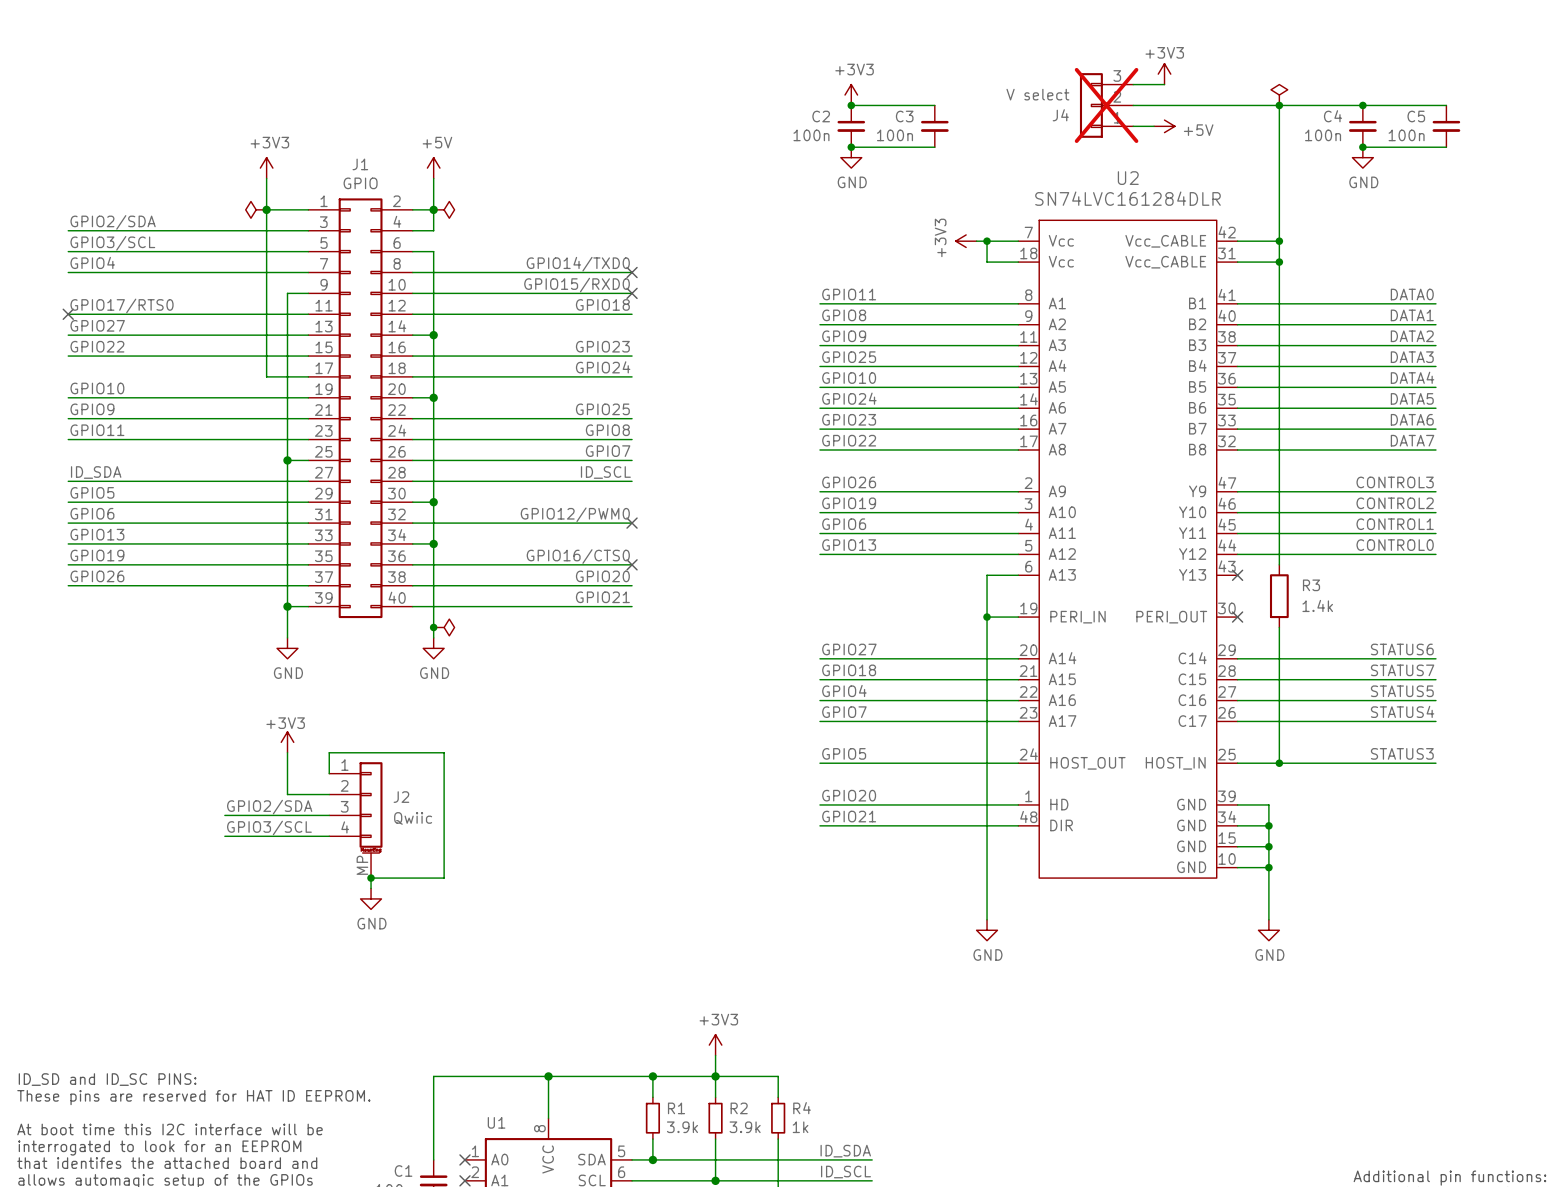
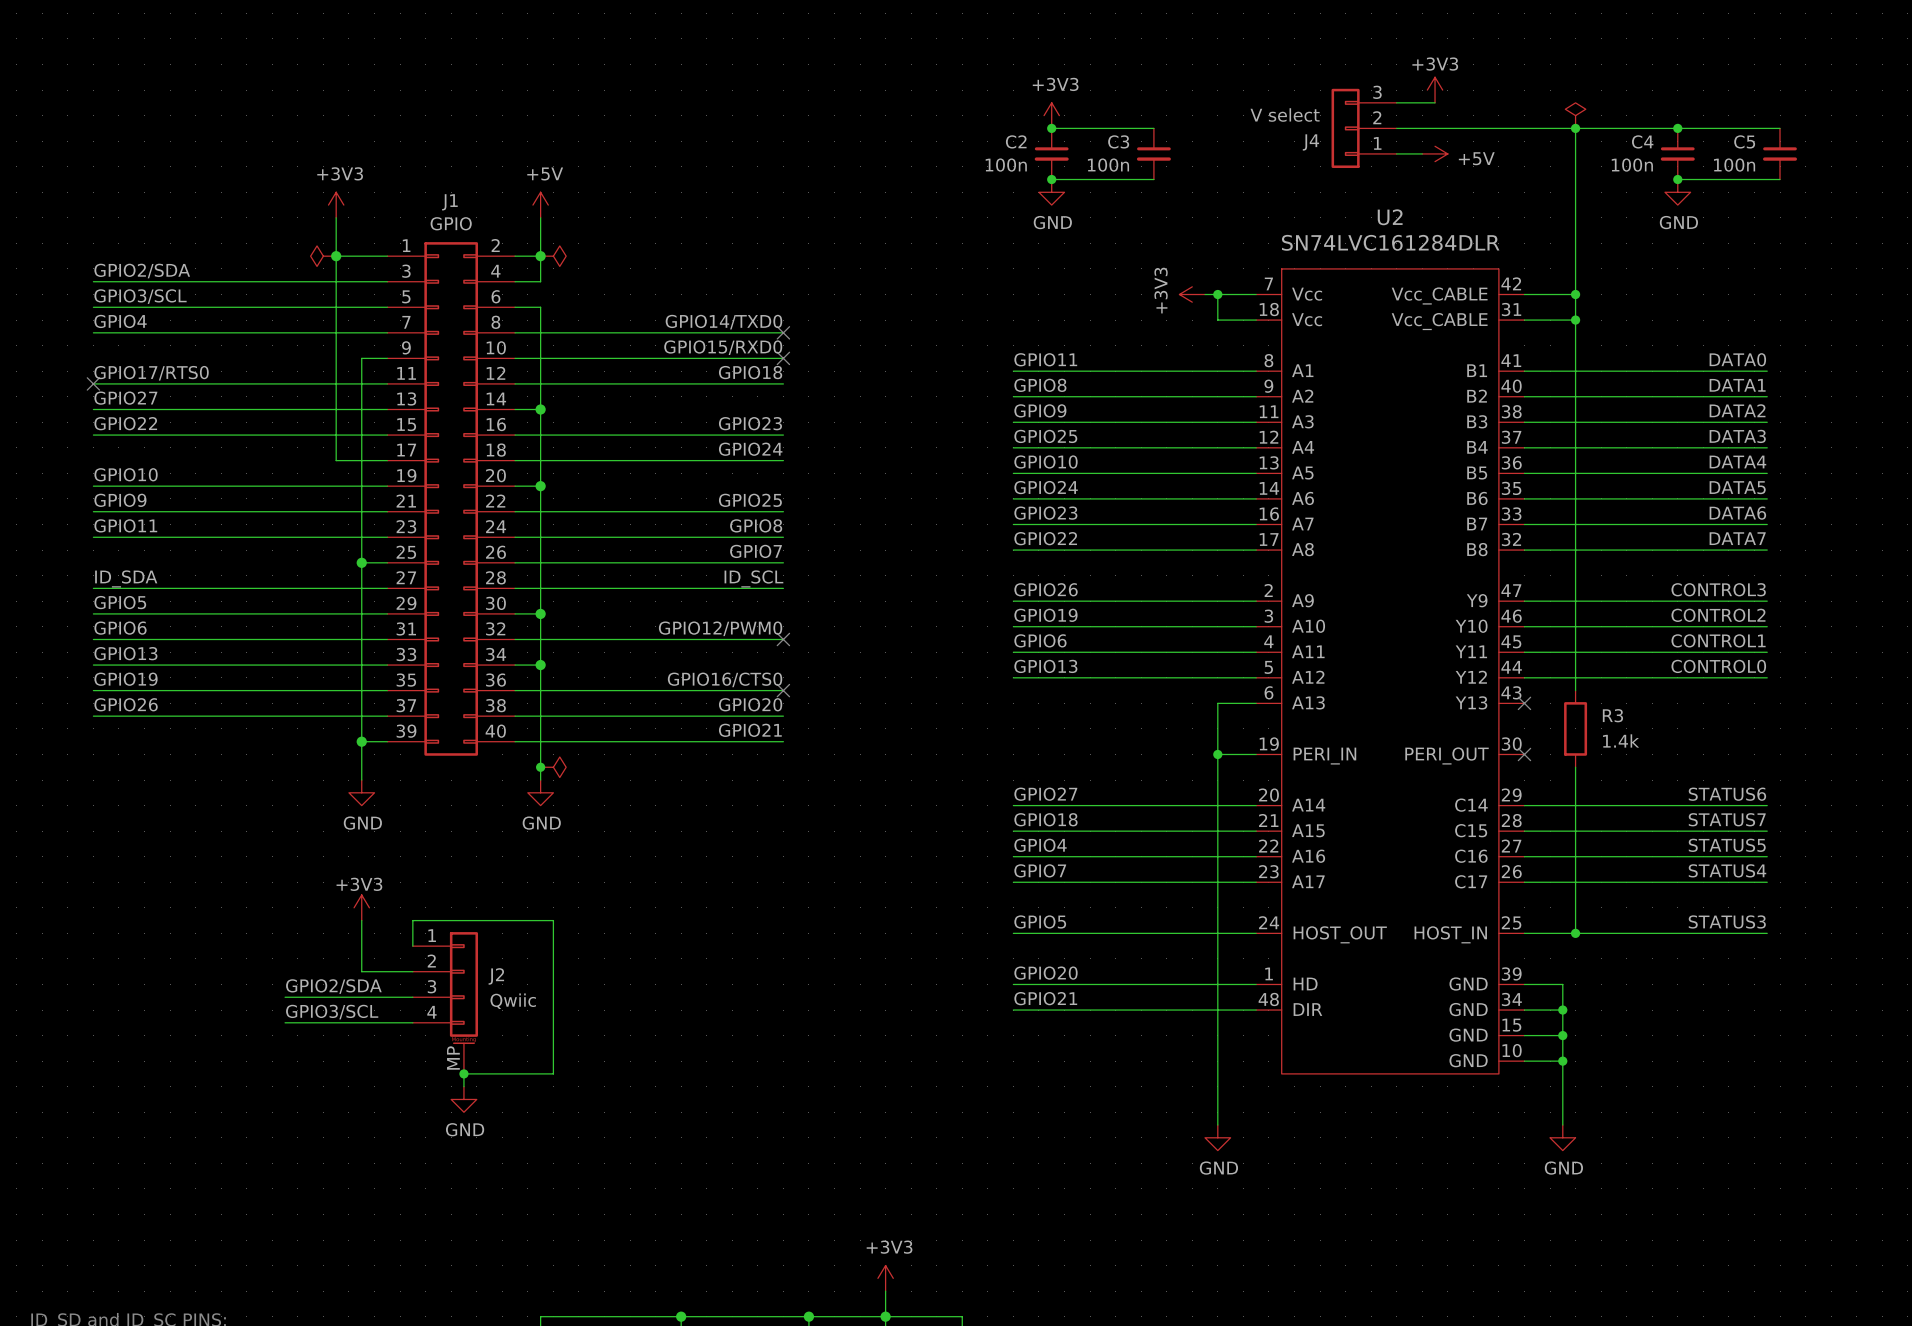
J4 do-not-place cross: (1106, 105) -> none

